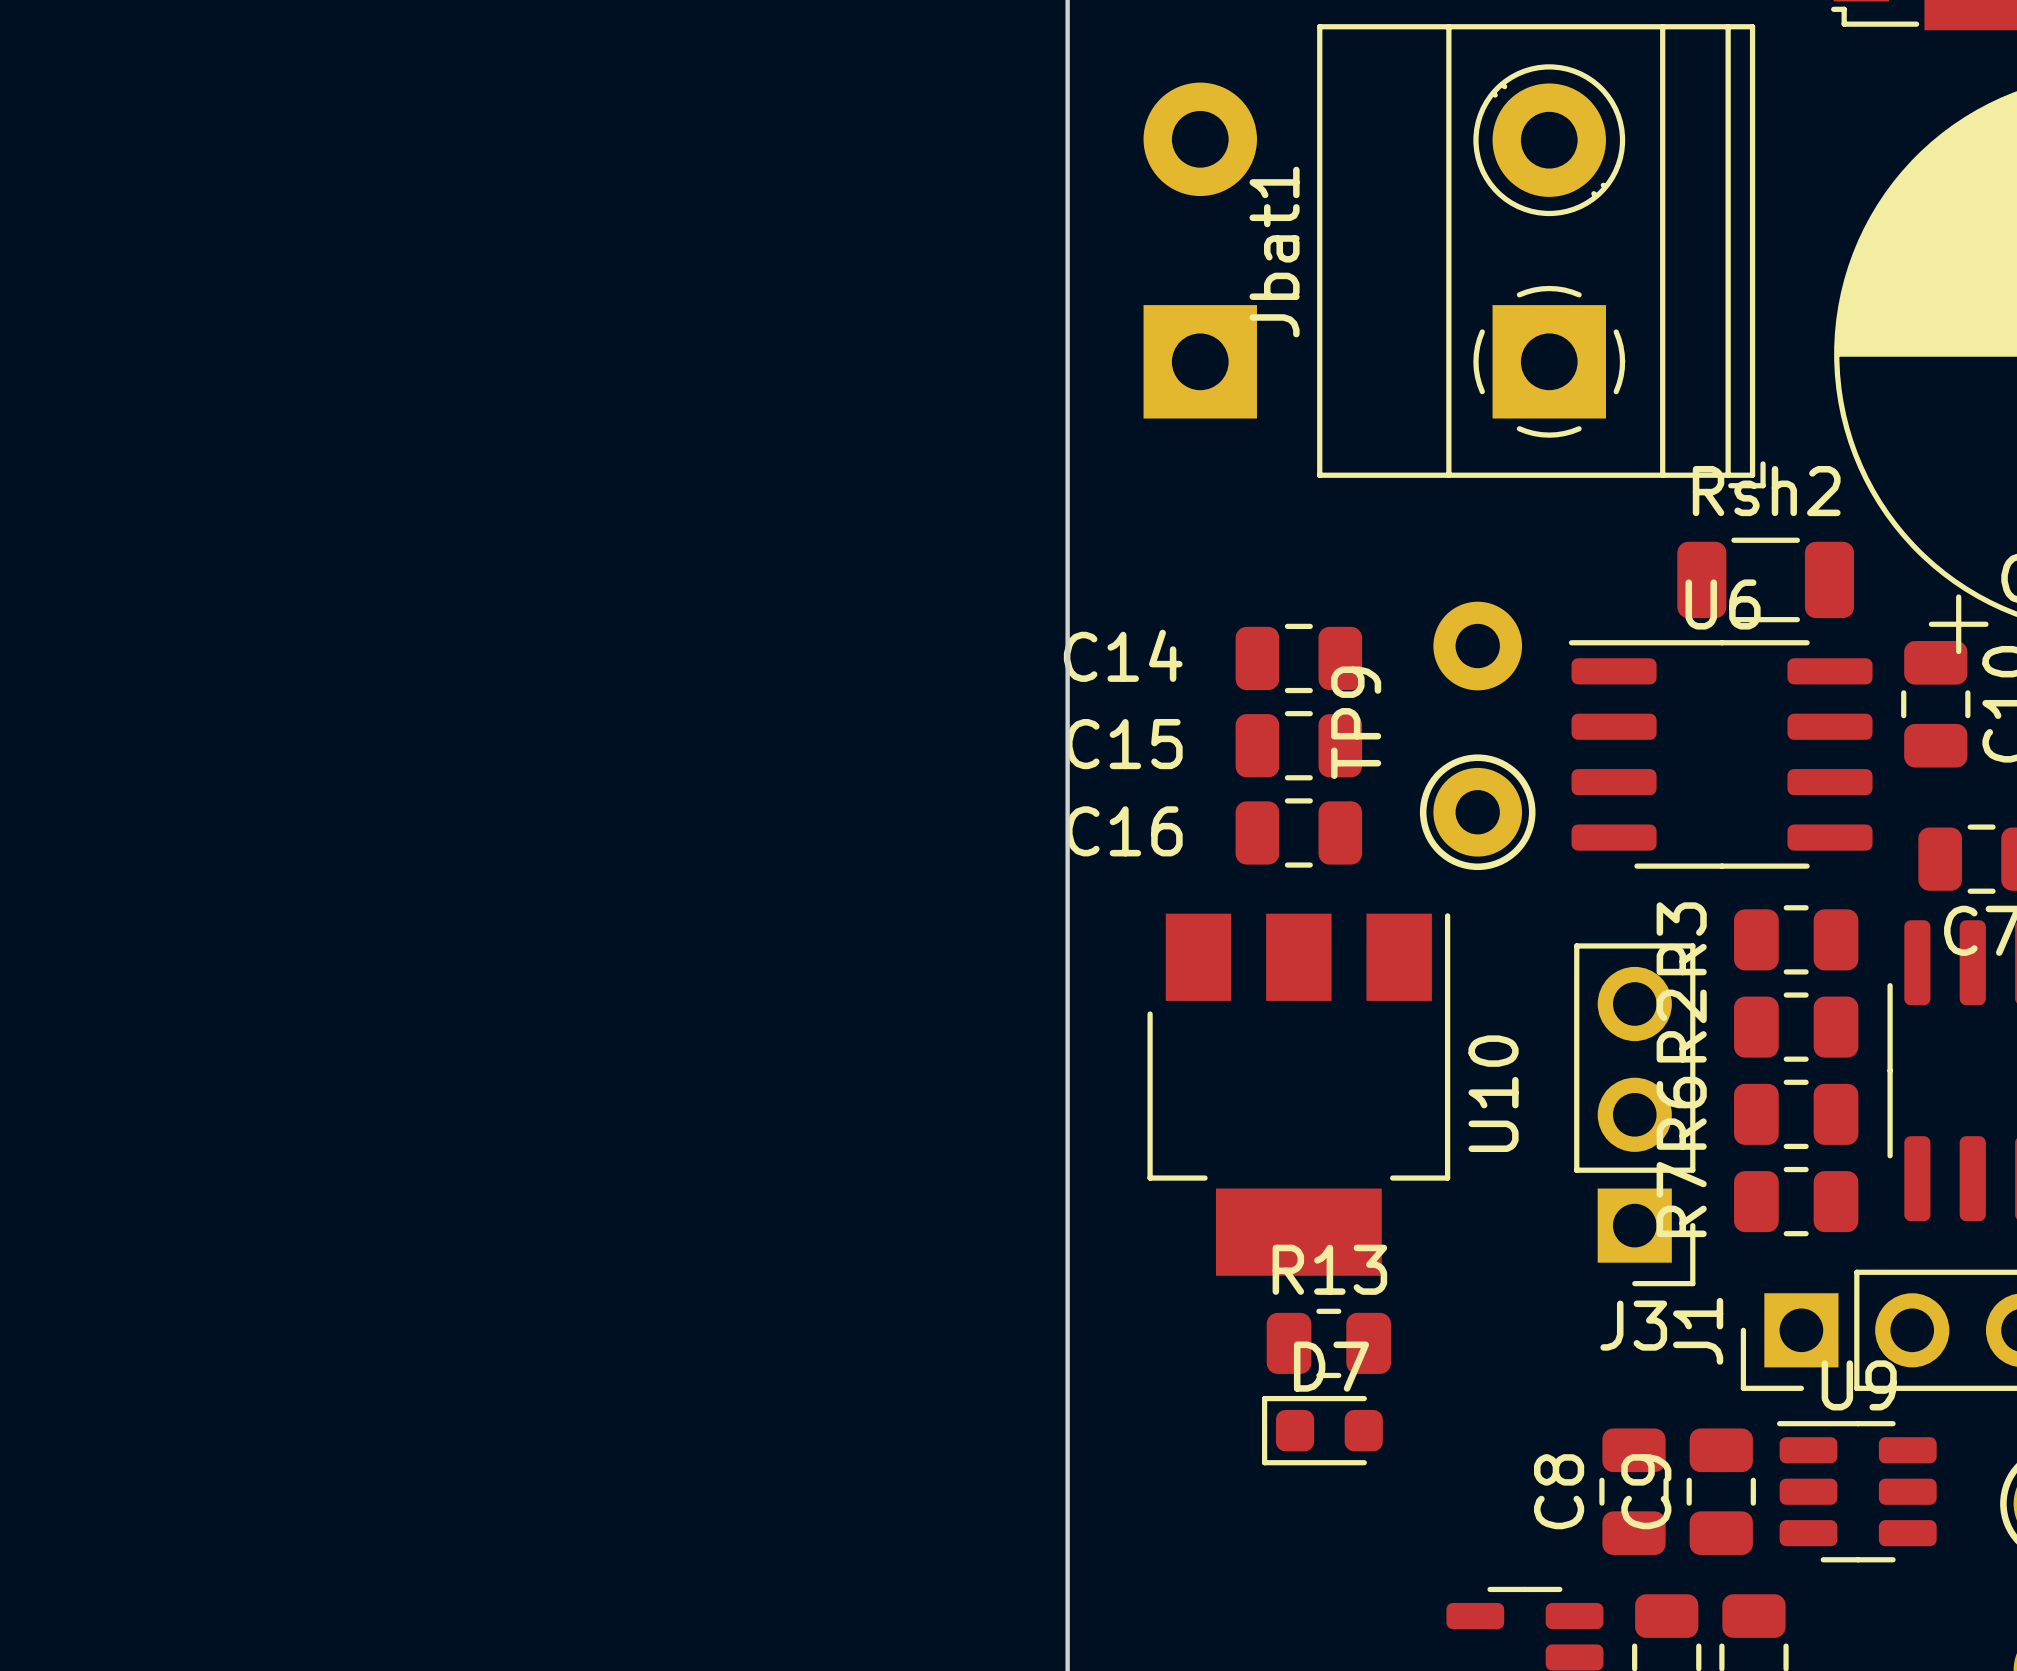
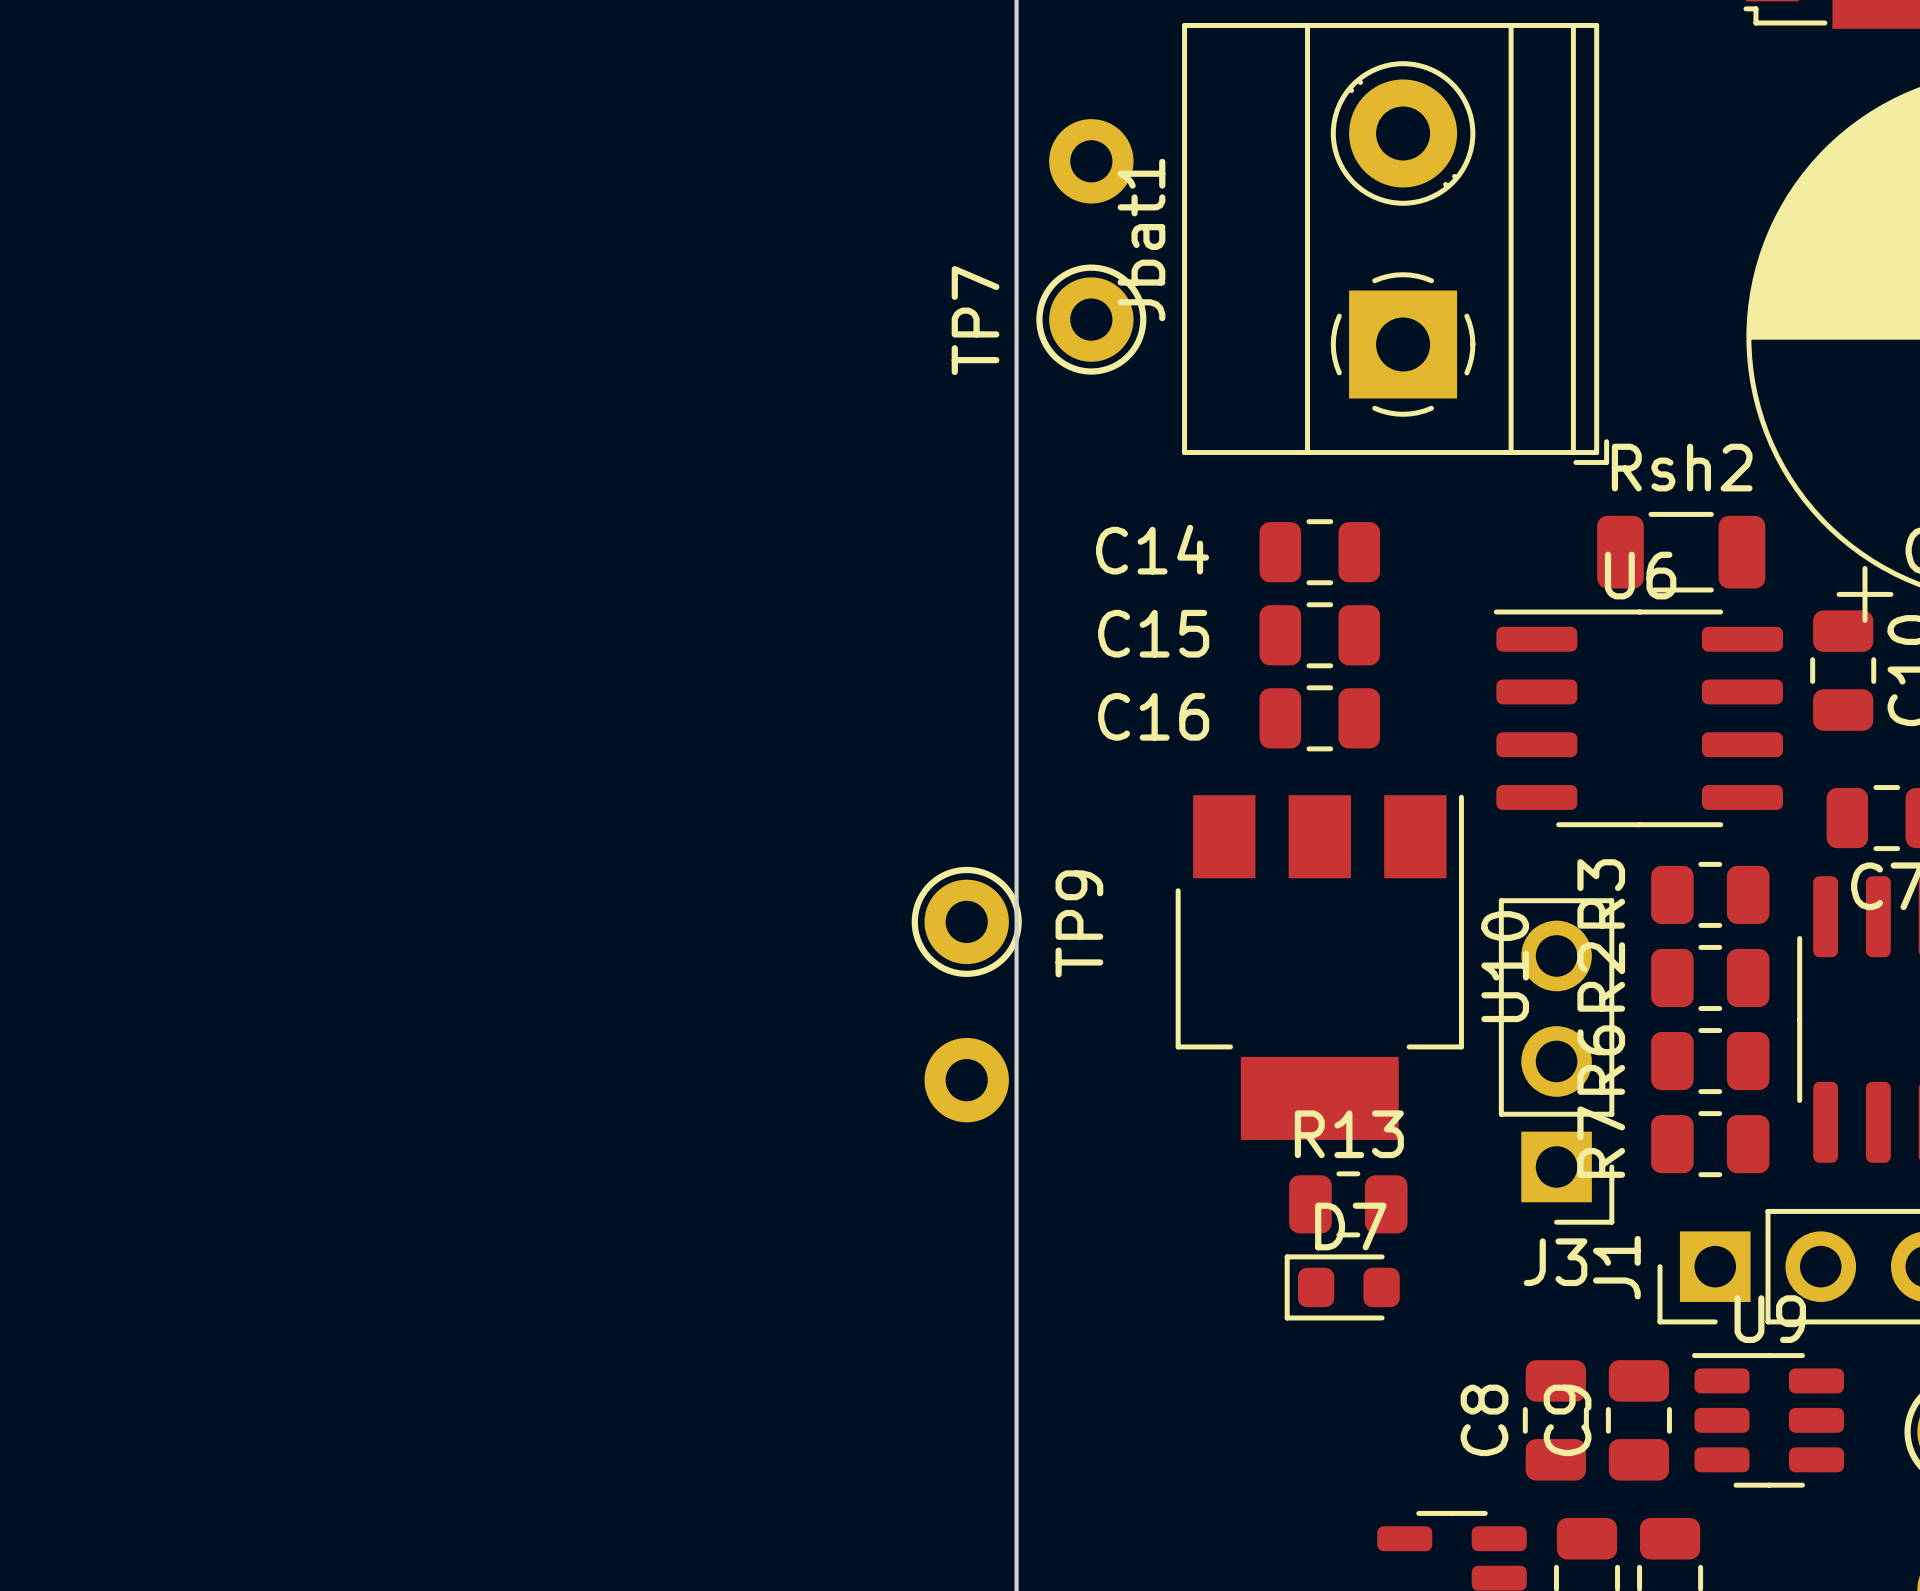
Jbat1 footprint: [1143, 24, 1766, 489] -> [1182, 22, 1610, 465]
TP7: none -> (1091, 246)
C14 position: (1298, 658) -> (1319, 552)
TP9 name position: TP9 (1356, 722) -> TP9 (1079, 923)
TP9 rotation: 0° (1477, 735) -> 180° (966, 994)
TP9 position: (1477, 735) -> (966, 994)
C15 position: (1298, 745) -> (1319, 635)
C16 position: (1298, 832) -> (1319, 718)
U10 position: (1298, 1094) -> (1319, 967)
R13 position: (1328, 1343) -> (1348, 1204)
D7 position: (1322, 1430) -> (1342, 1287)

